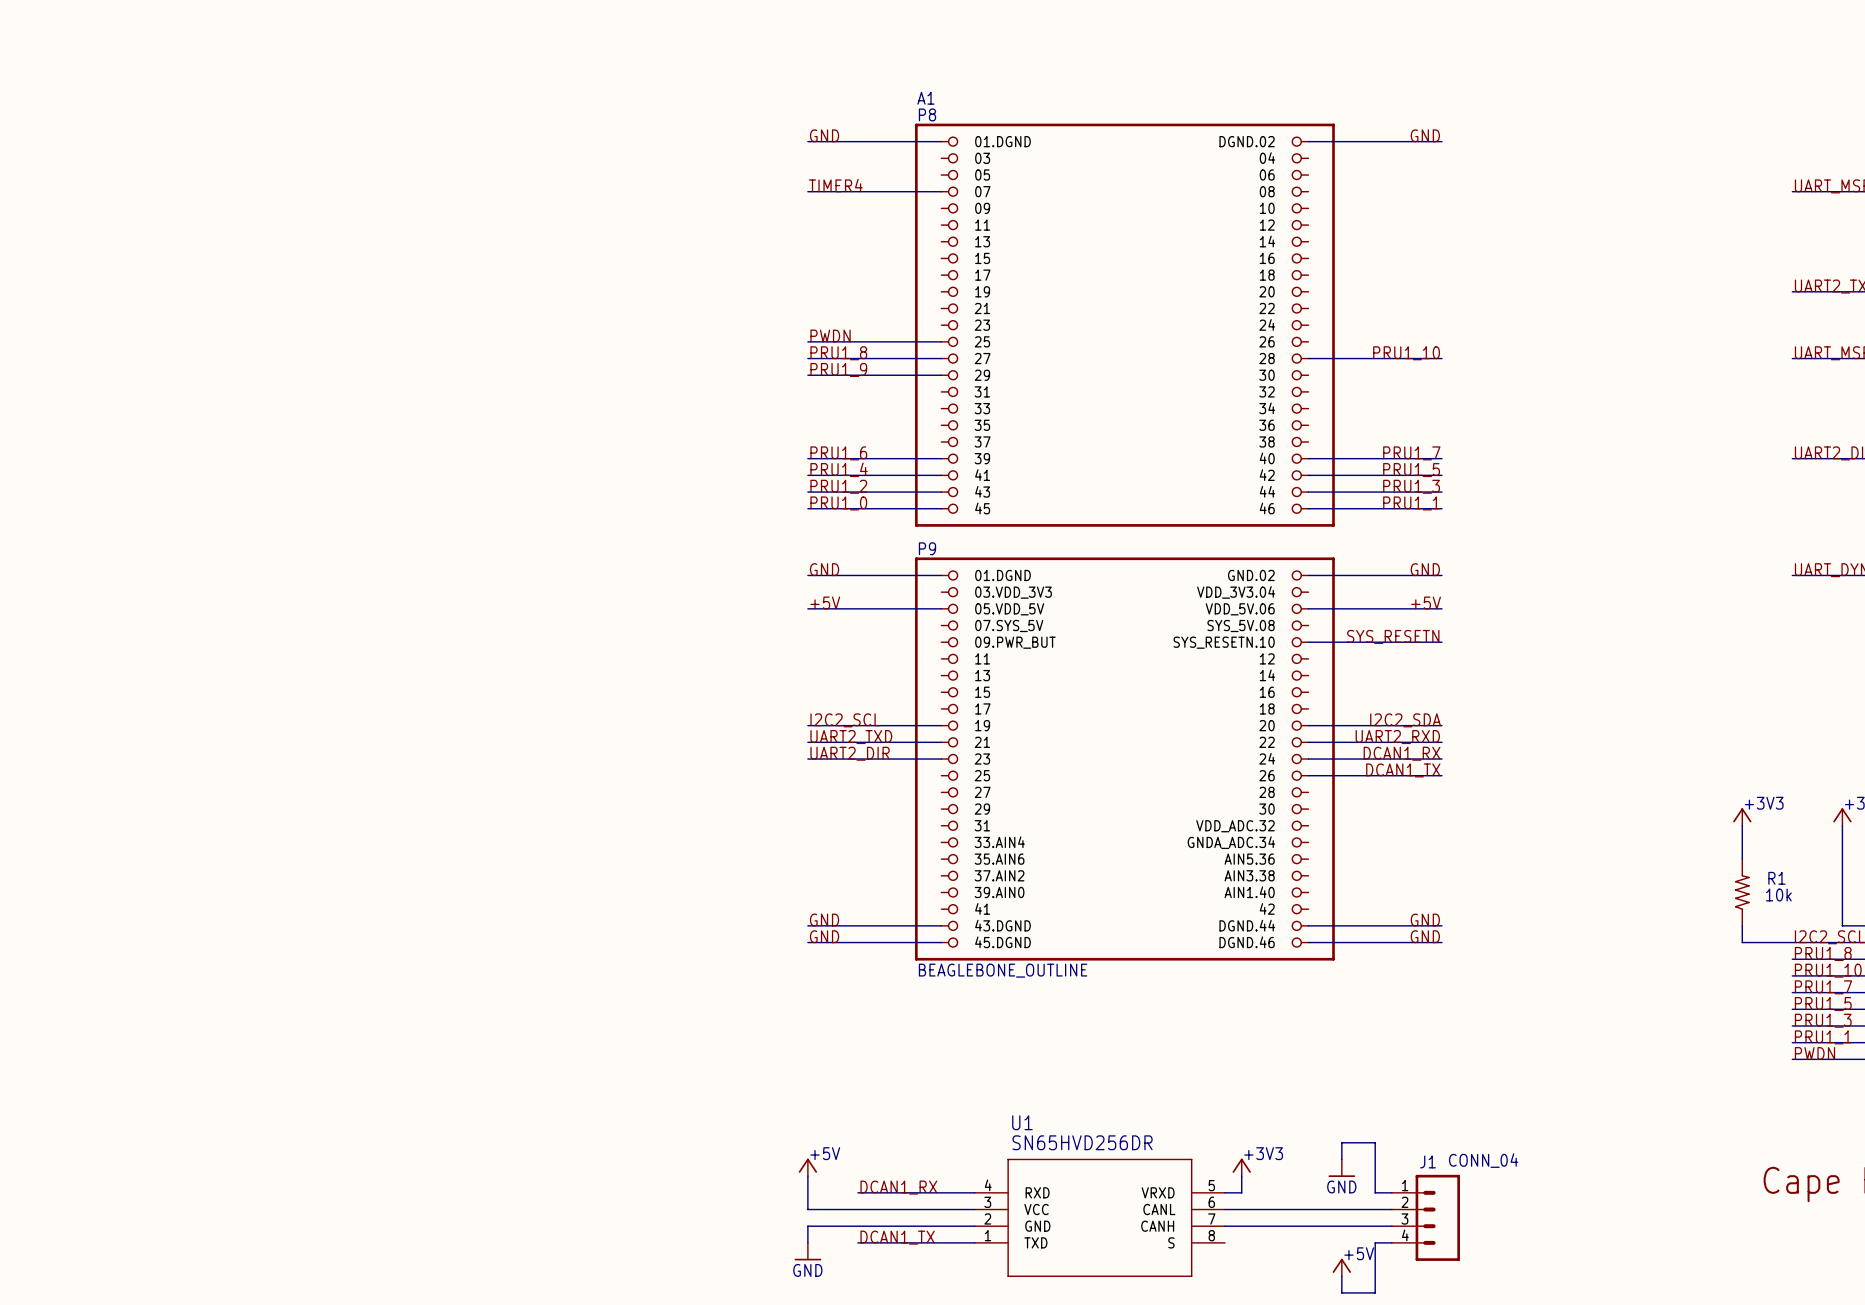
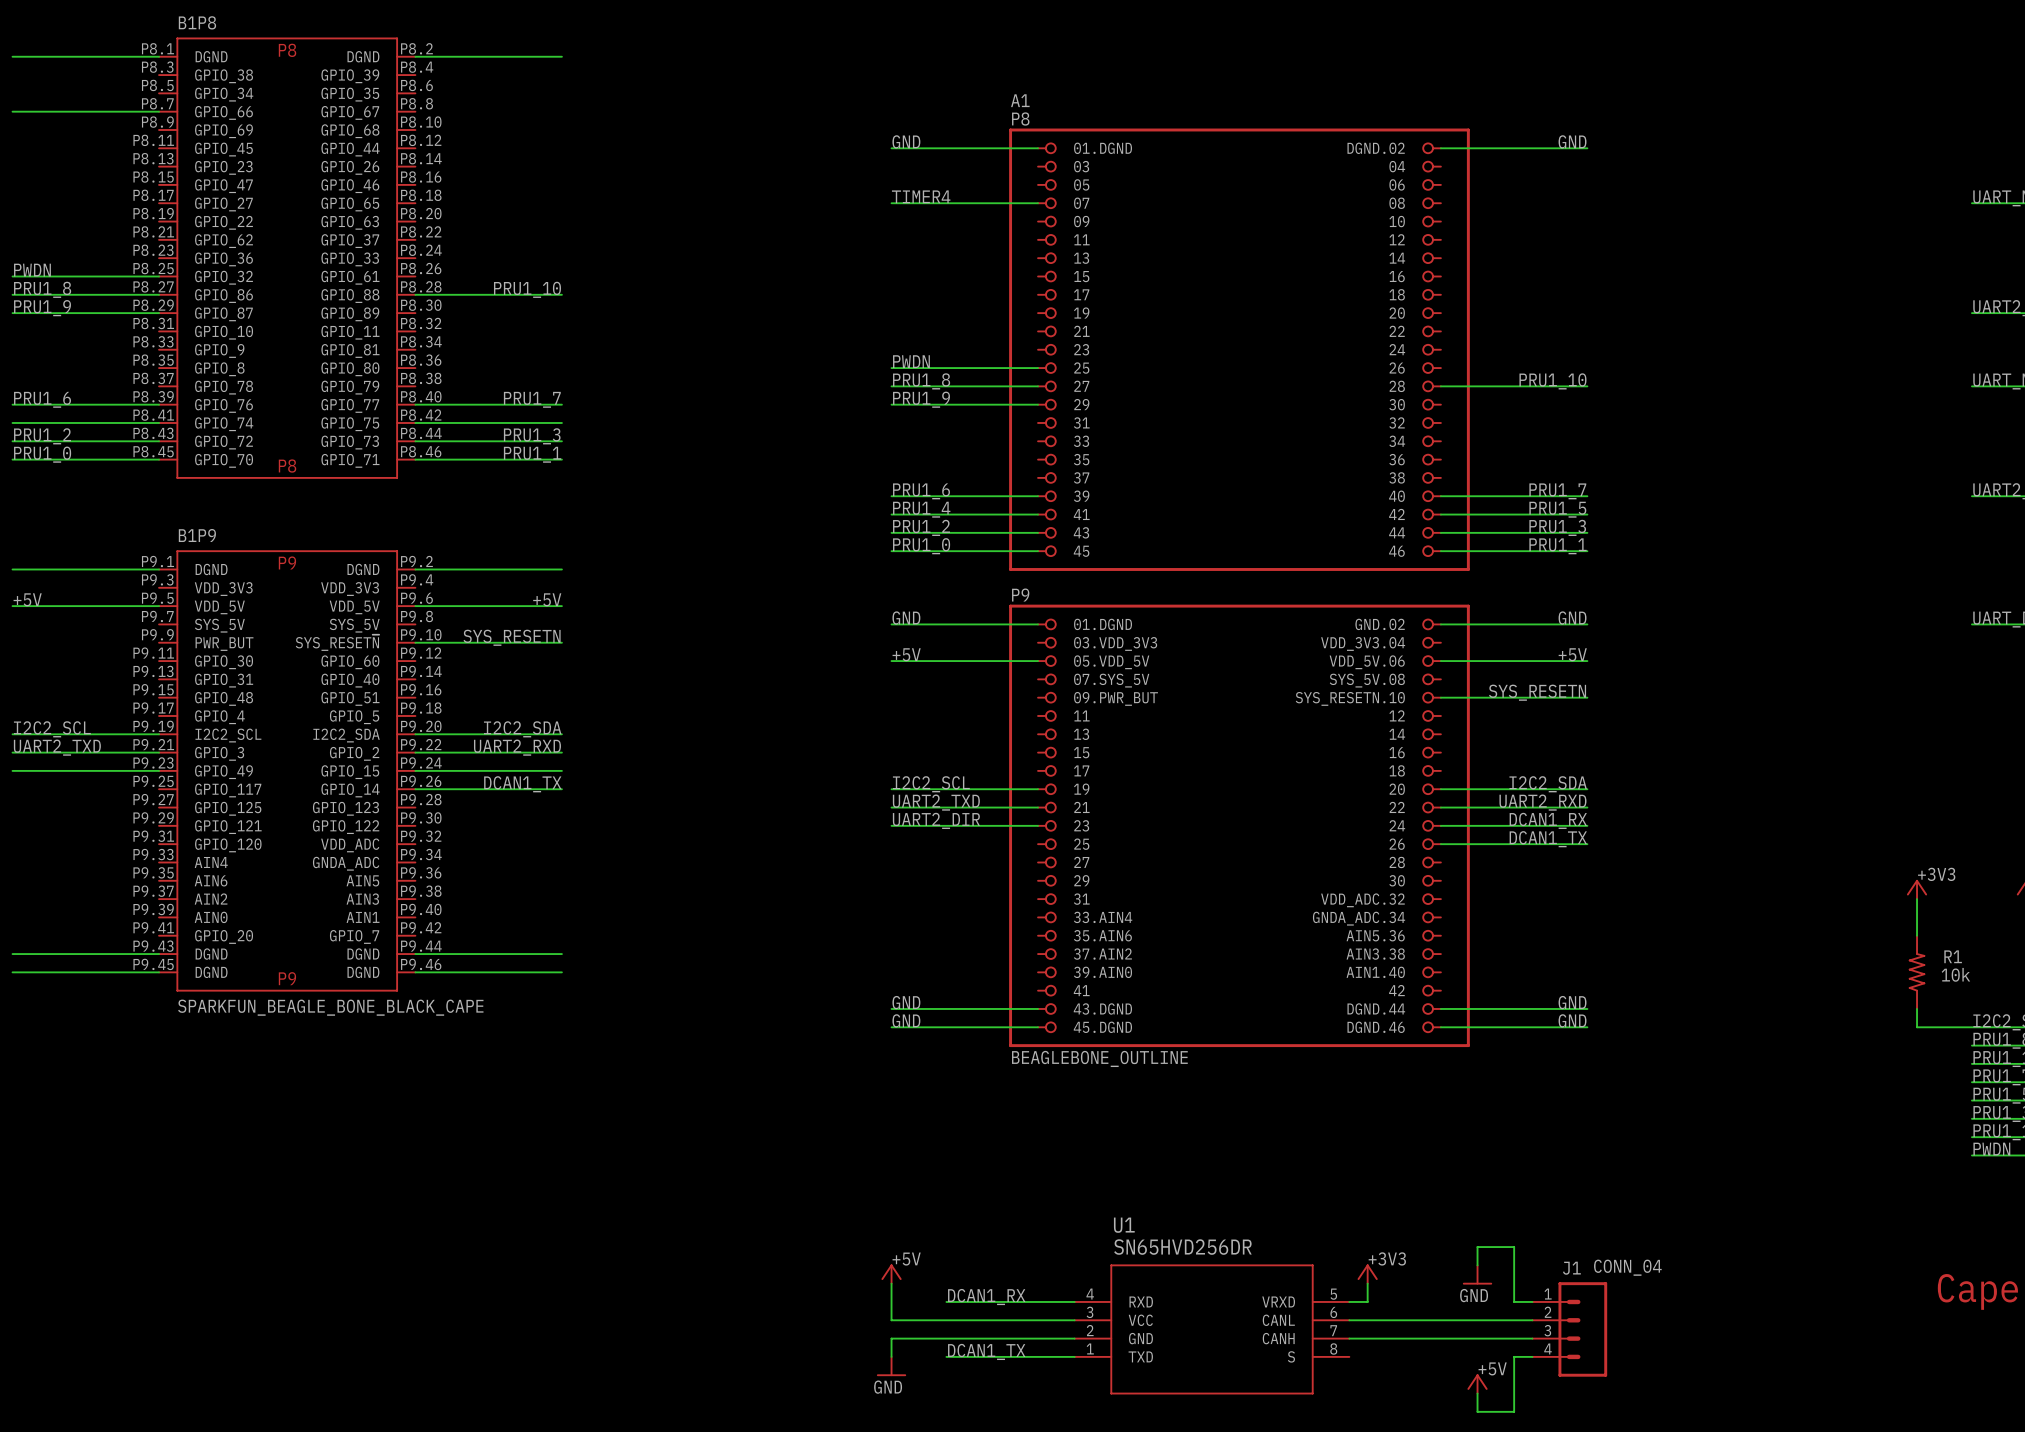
wire: none -> (12, 56) (159, 56)
wire: none -> (415, 56) (561, 56)
wire: none -> (12, 111) (159, 111)
B1P8: none -> (287, 258)
label: none -> PWDN (32, 270)
wire: none -> (12, 276) (159, 276)
label: none -> PRU1_8 (42, 289)
label: none -> PRU1_10 (527, 289)
wire: none -> (12, 294) (159, 294)
wire: none -> (415, 294) (561, 294)
label: none -> PRU1_9 (42, 308)
wire: none -> (12, 313) (159, 313)
label: none -> PRU1_6 (42, 399)
label: none -> PRU1_7 (532, 399)
wire: none -> (12, 404) (159, 404)
wire: none -> (415, 404) (561, 404)
wire: none -> (12, 422) (159, 422)
wire: none -> (415, 422) (561, 422)
label: none -> PRU1_2 (42, 436)
label: none -> PRU1_3 (532, 436)
wire: none -> (12, 441) (159, 441)
wire: none -> (415, 441) (561, 441)
label: none -> PRU1_0 (42, 454)
label: none -> PRU1_1 (532, 454)
wire: none -> (12, 459) (159, 459)
wire: none -> (415, 459) (561, 459)
wire: none -> (12, 569) (159, 569)
wire: none -> (415, 569) (561, 569)
label: none -> +5V (27, 599)
label: none -> +5V (547, 599)
wire: none -> (12, 606) (159, 606)
wire: none -> (415, 606) (561, 606)
label: none -> SYS_RESETN (512, 637)
wire: none -> (415, 642) (561, 642)
label: none -> I2C2_SCL (52, 729)
label: none -> I2C2_SDA (522, 729)
wire: none -> (12, 734) (159, 734)
wire: none -> (415, 734) (561, 734)
label: none -> UART2_TXD (57, 747)
label: none -> UART2_RXD (517, 747)
wire: none -> (12, 752) (159, 752)
wire: none -> (415, 752) (561, 752)
wire: none -> (12, 770) (159, 770)
B1P9: none -> SPARKFUN_BEAGLE_BONE_BLACK_CAPE (287, 770)
wire: none -> (415, 770) (561, 770)
label: none -> DCAN1_TX (522, 784)
wire: none -> (415, 789) (561, 789)
wire: none -> (12, 954) (159, 954)
wire: none -> (415, 954) (561, 954)
wire: none -> (12, 972) (159, 972)
wire: none -> (415, 972) (561, 972)

